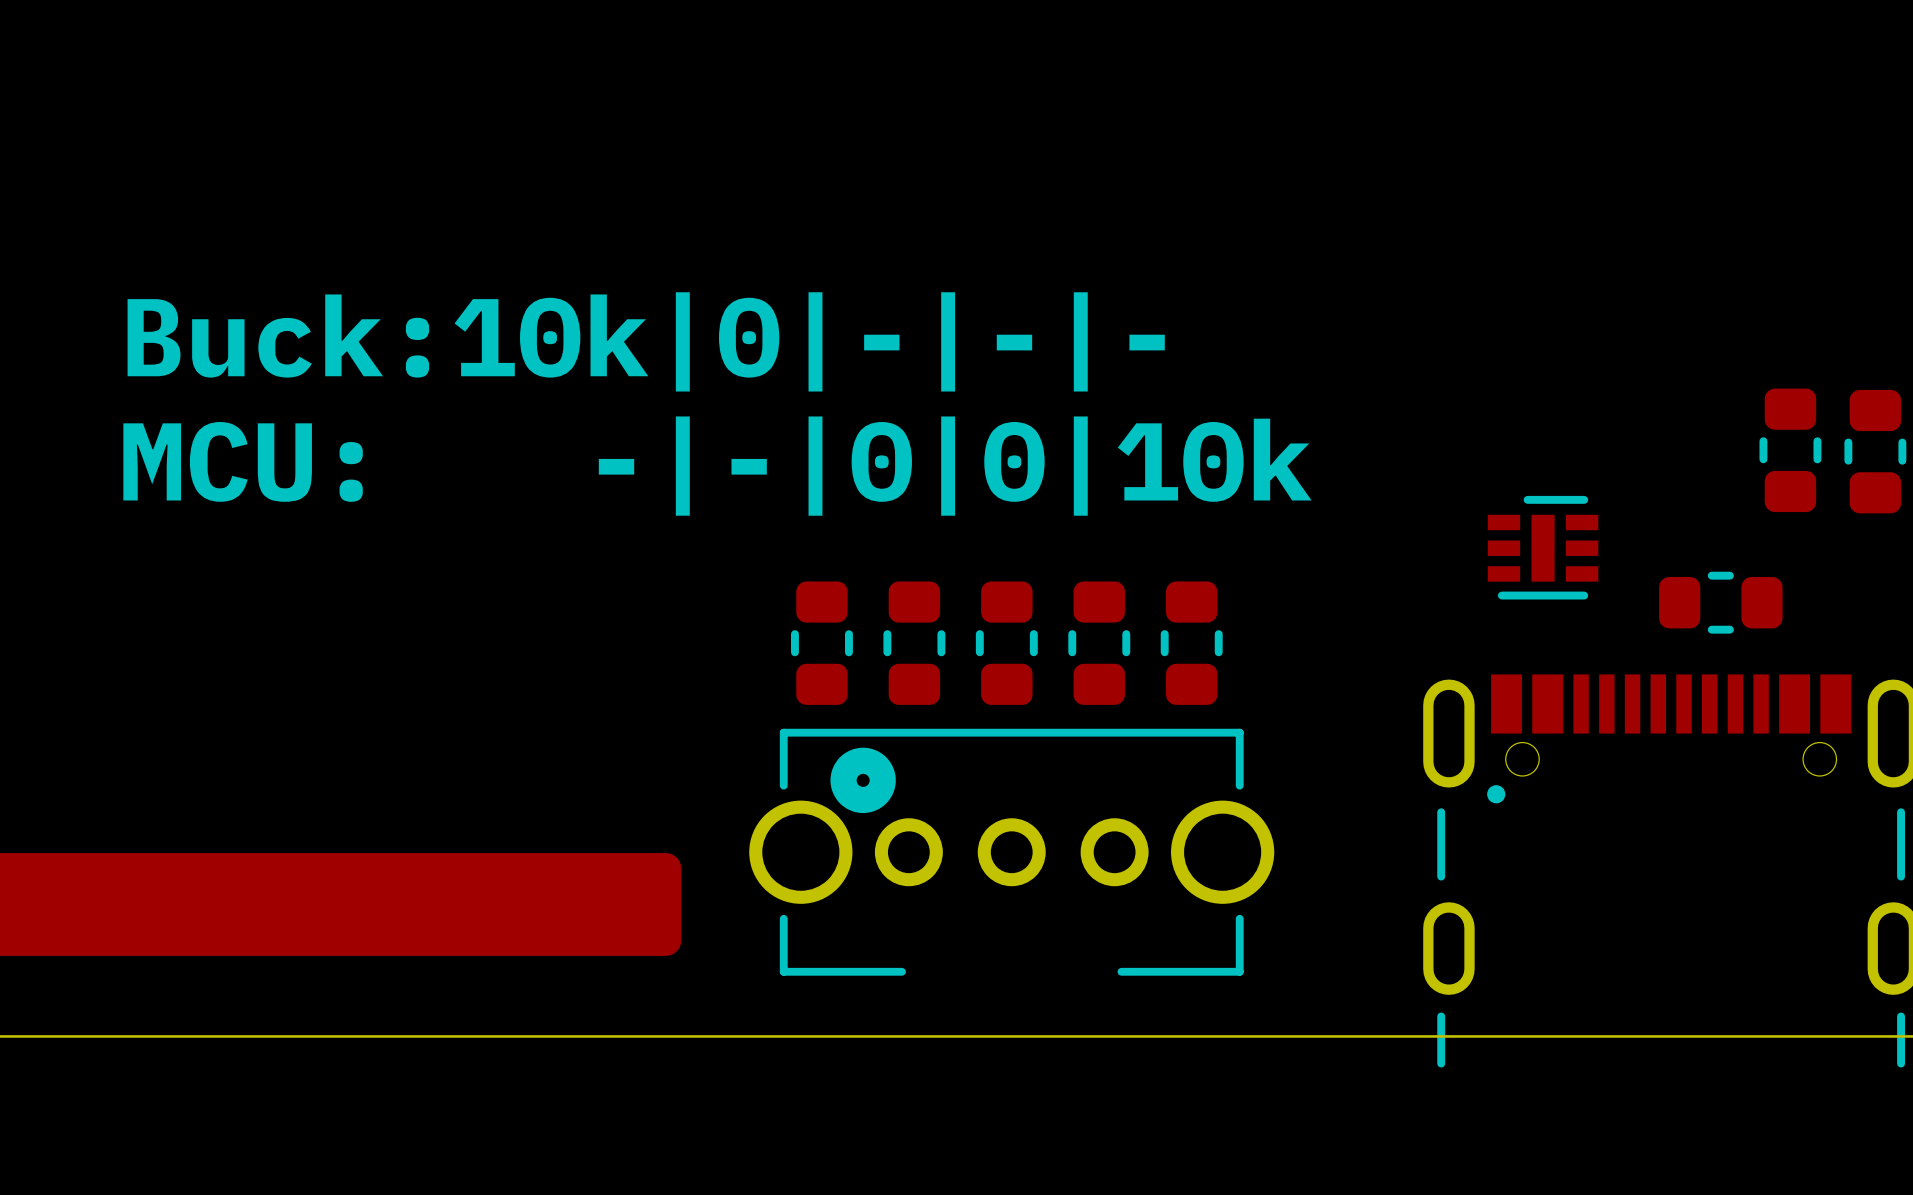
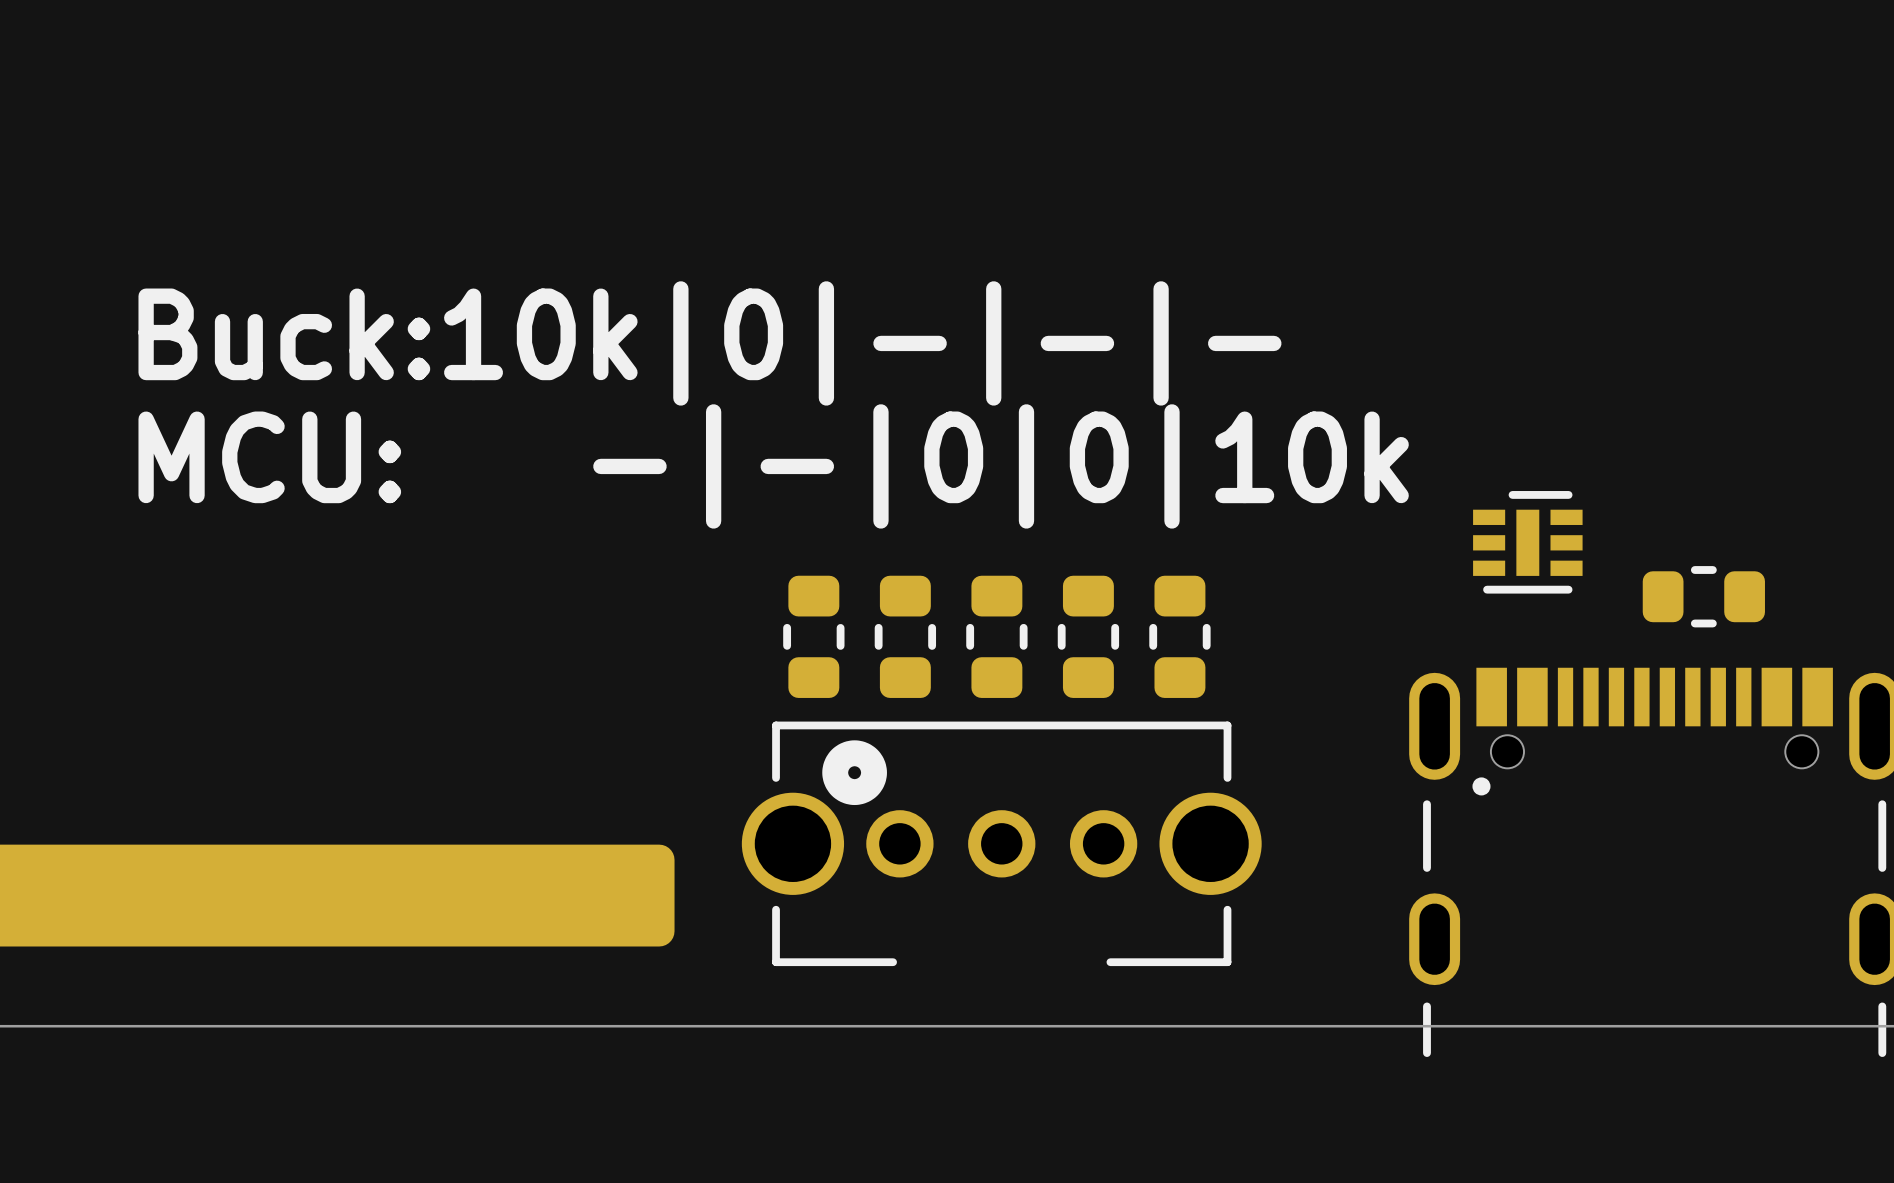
part: (1790, 450) -> none
part: (1875, 451) -> none

